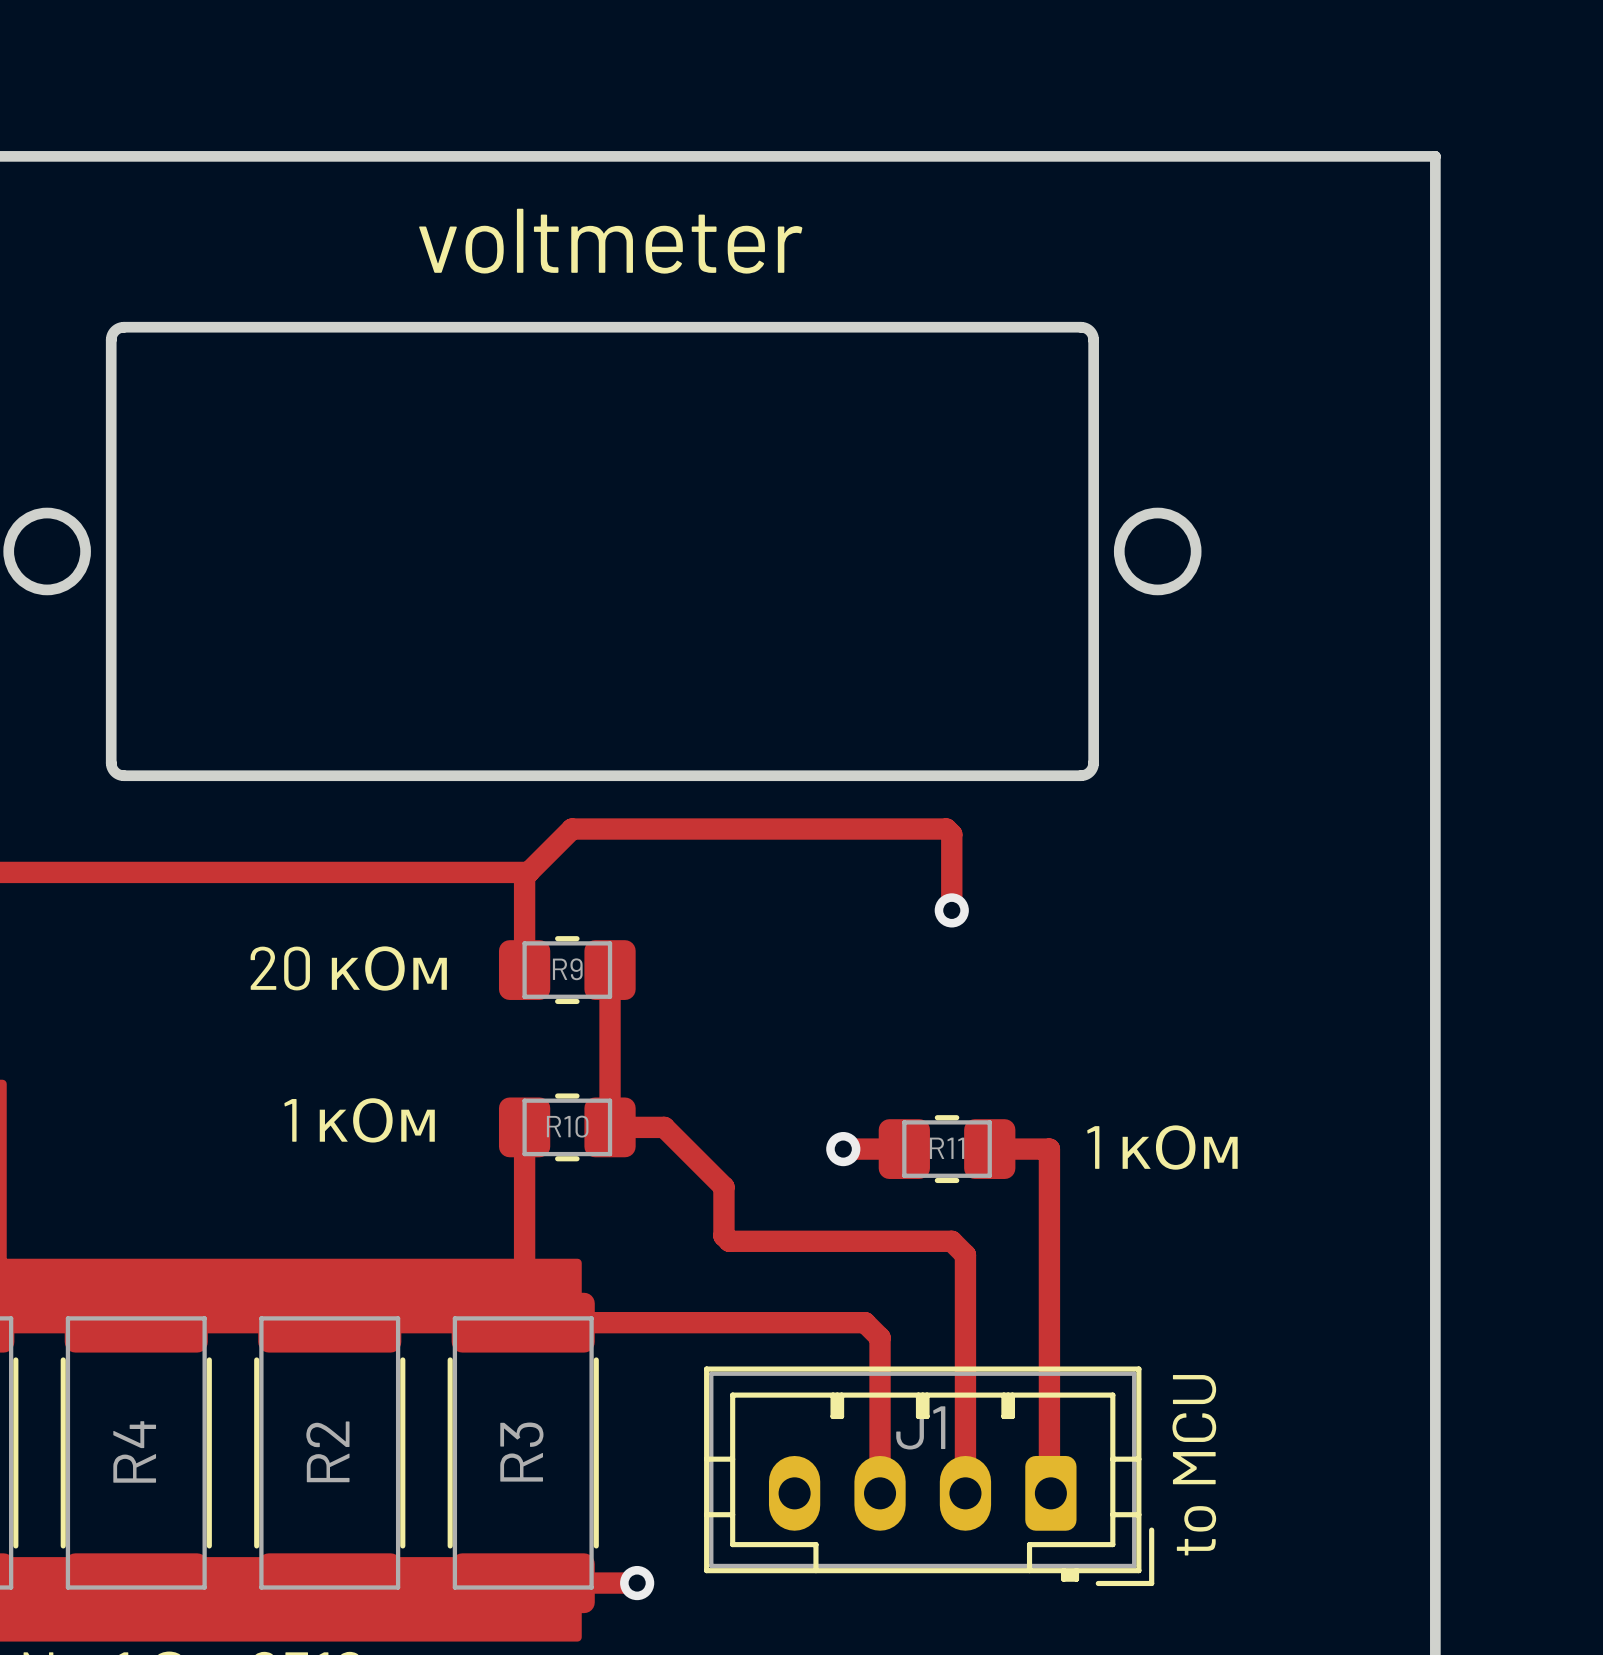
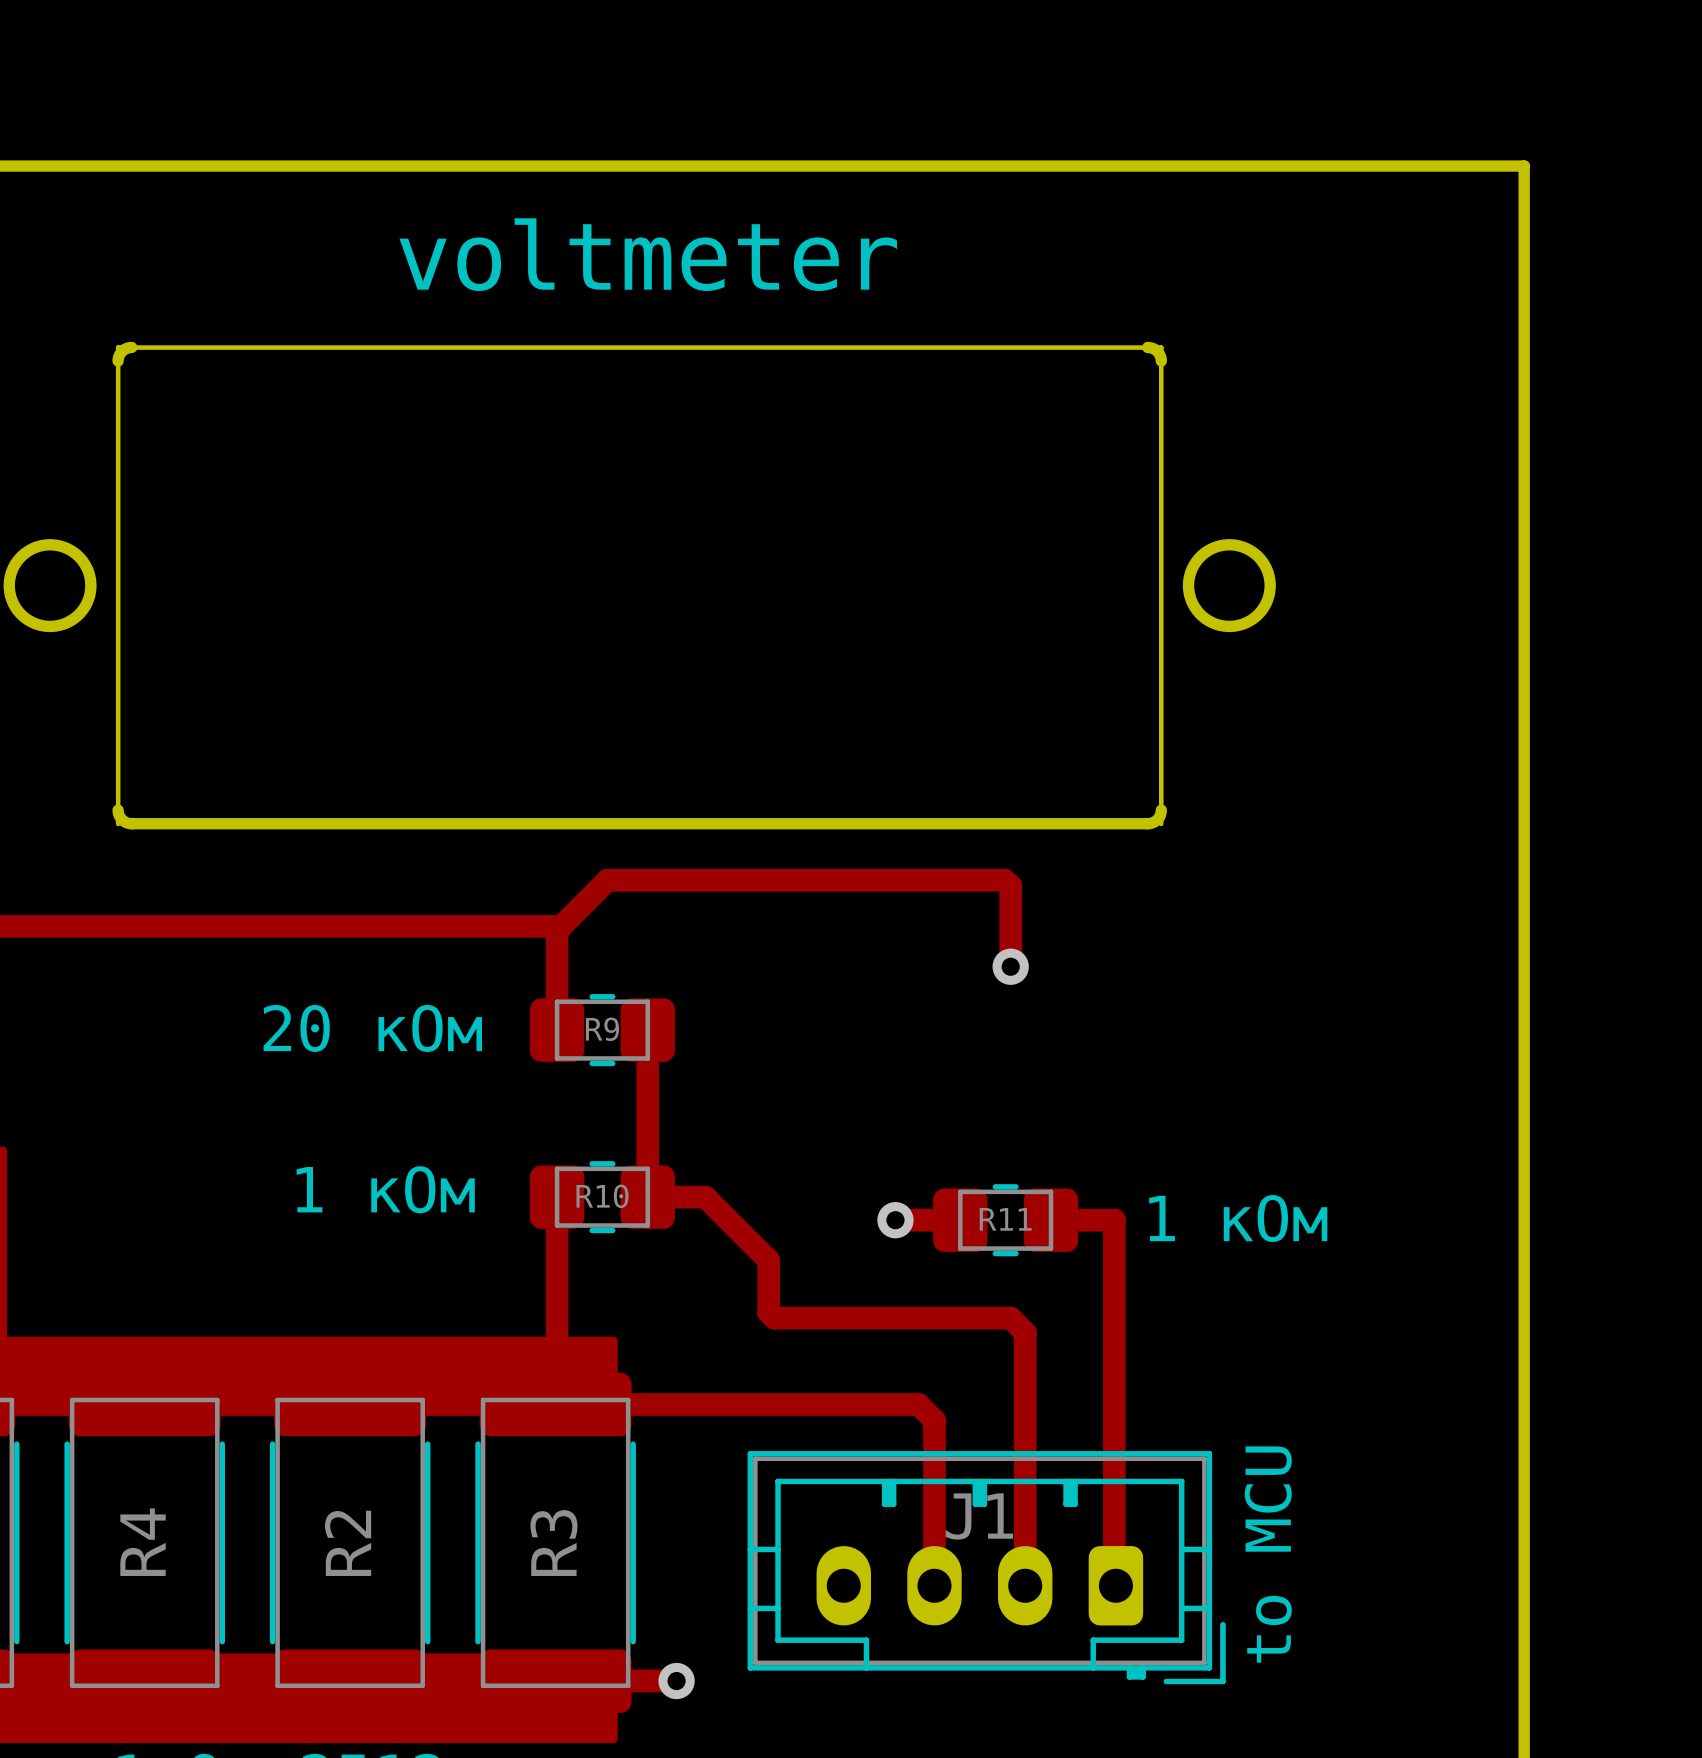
board edge width: thick (124, 327) (1080, 327) -> thin (131, 347) (1147, 347)
board edge width: thick (111, 340) (111, 762) -> thin (118, 361) (118, 810)
board edge width: thick (1093, 340) (1093, 762) -> thin (1161, 361) (1161, 810)

